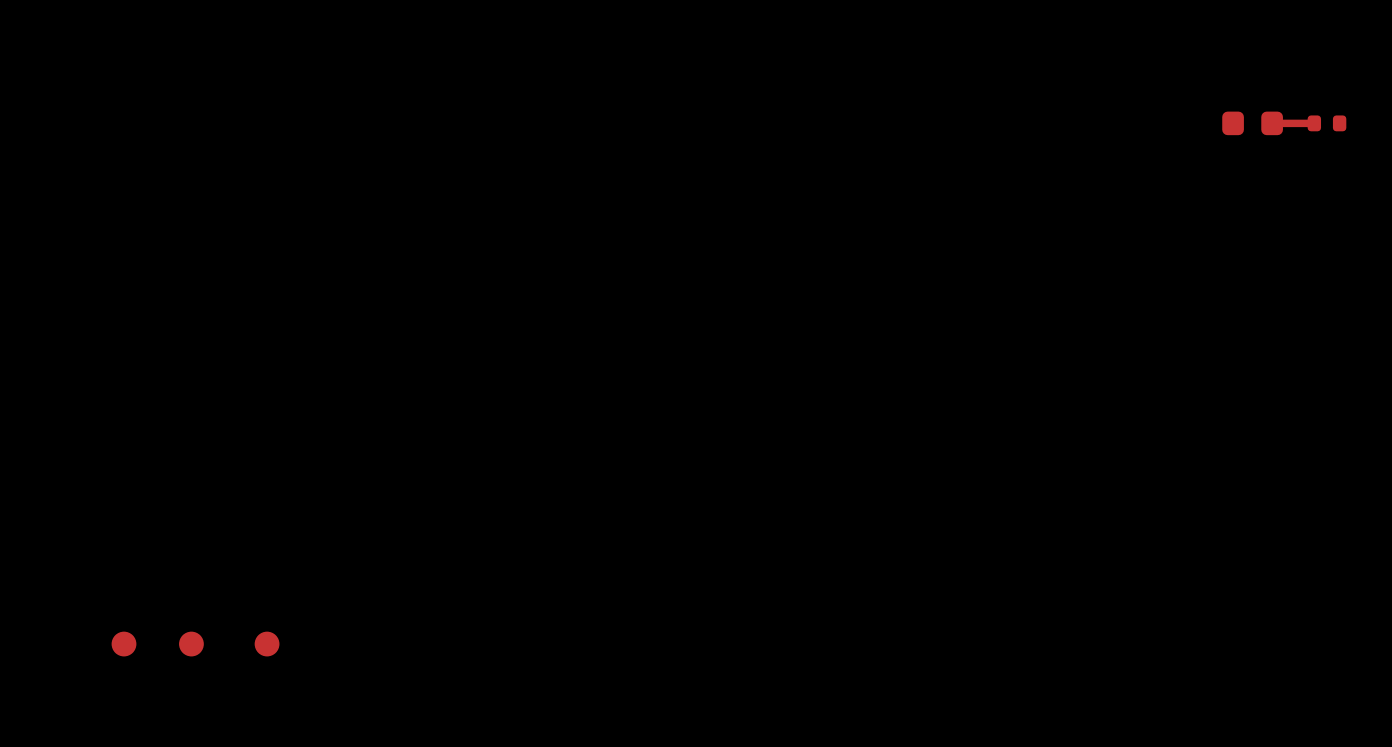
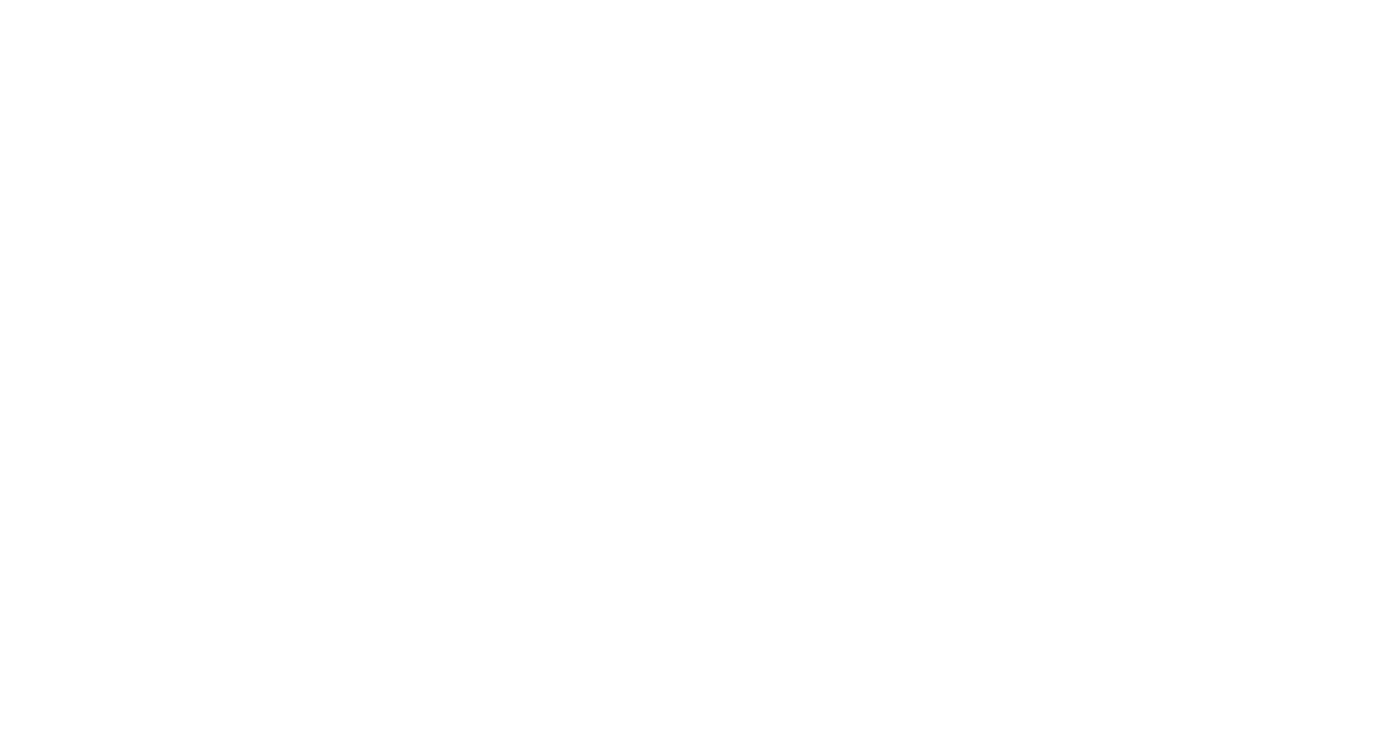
part: (1252, 123) -> none
top track: (1314, 123) (1272, 123) -> none
part: (1326, 123) -> none
part: (124, 644) -> none
part: (191, 644) -> none
part: (267, 644) -> none

